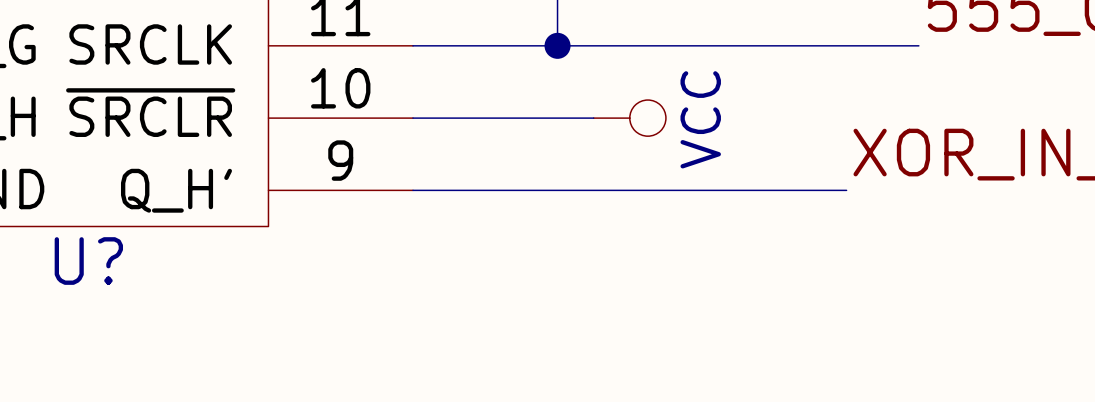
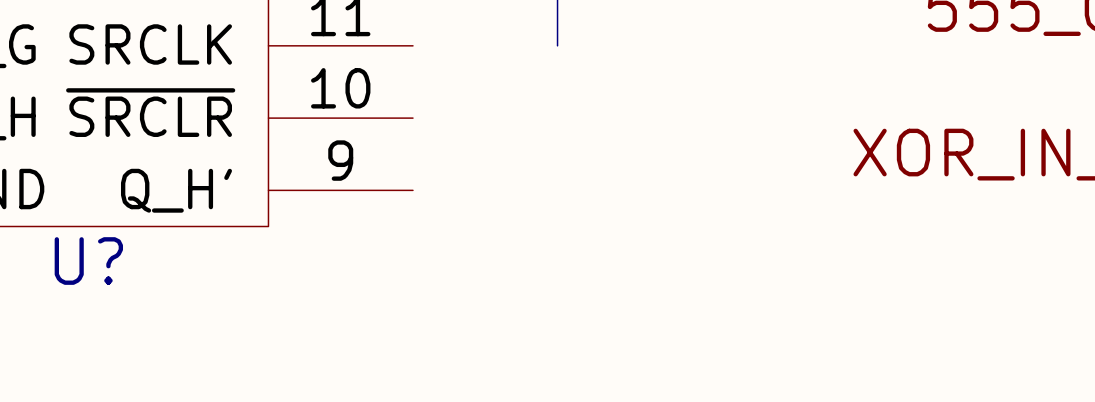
wire: (413, 45) (918, 45) -> none
junction: (557, 45) -> none
wire: (413, 118) (593, 118) -> none
power symbol: VCC (629, 118) -> none
wire: (413, 190) (846, 190) -> none

